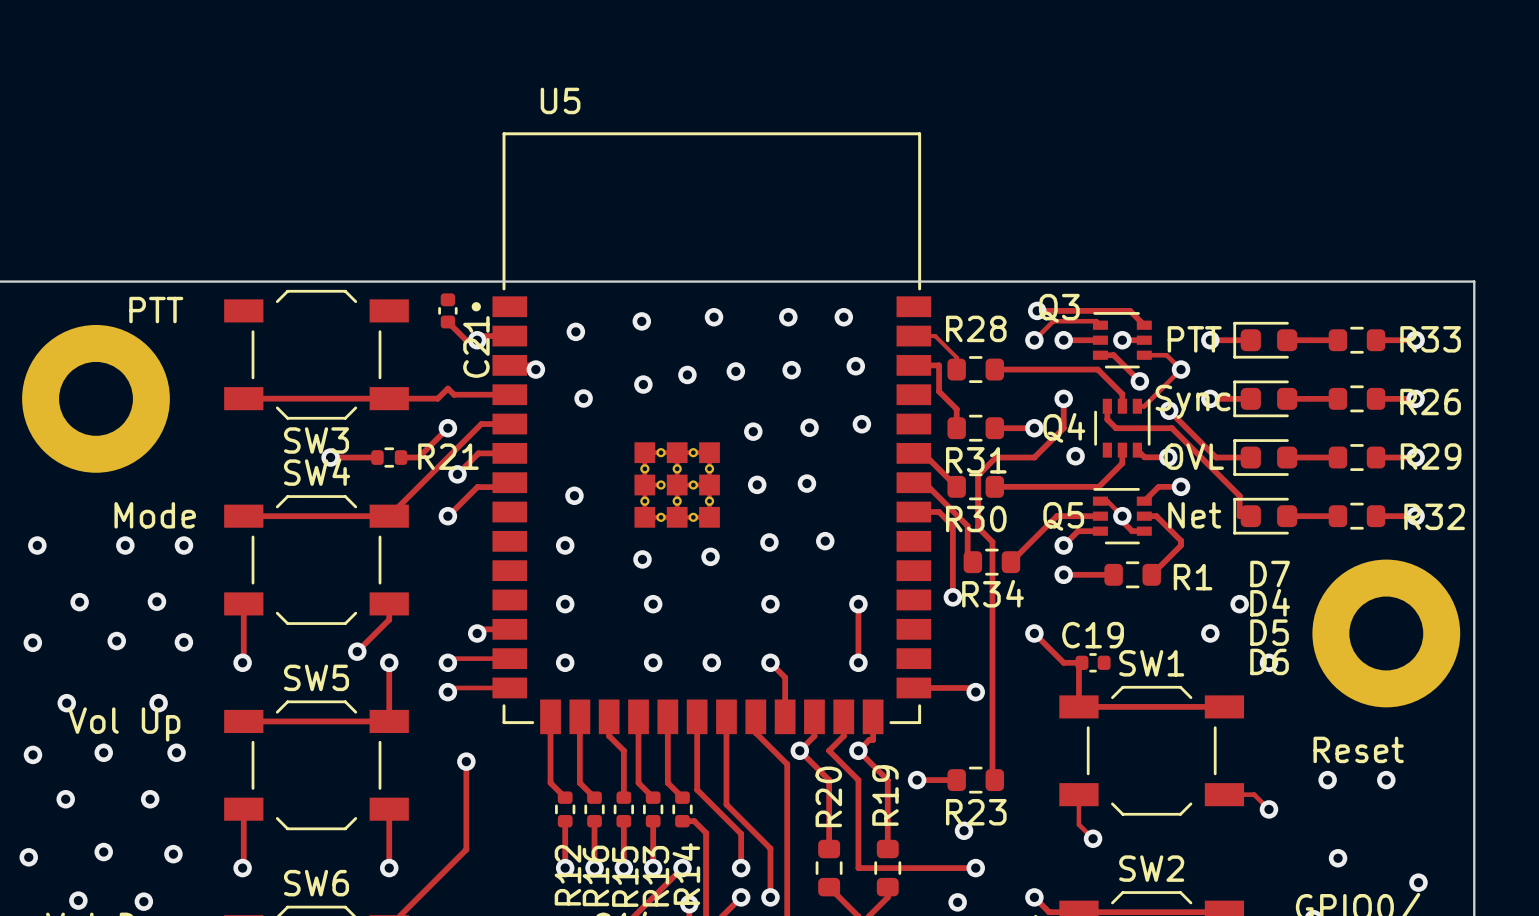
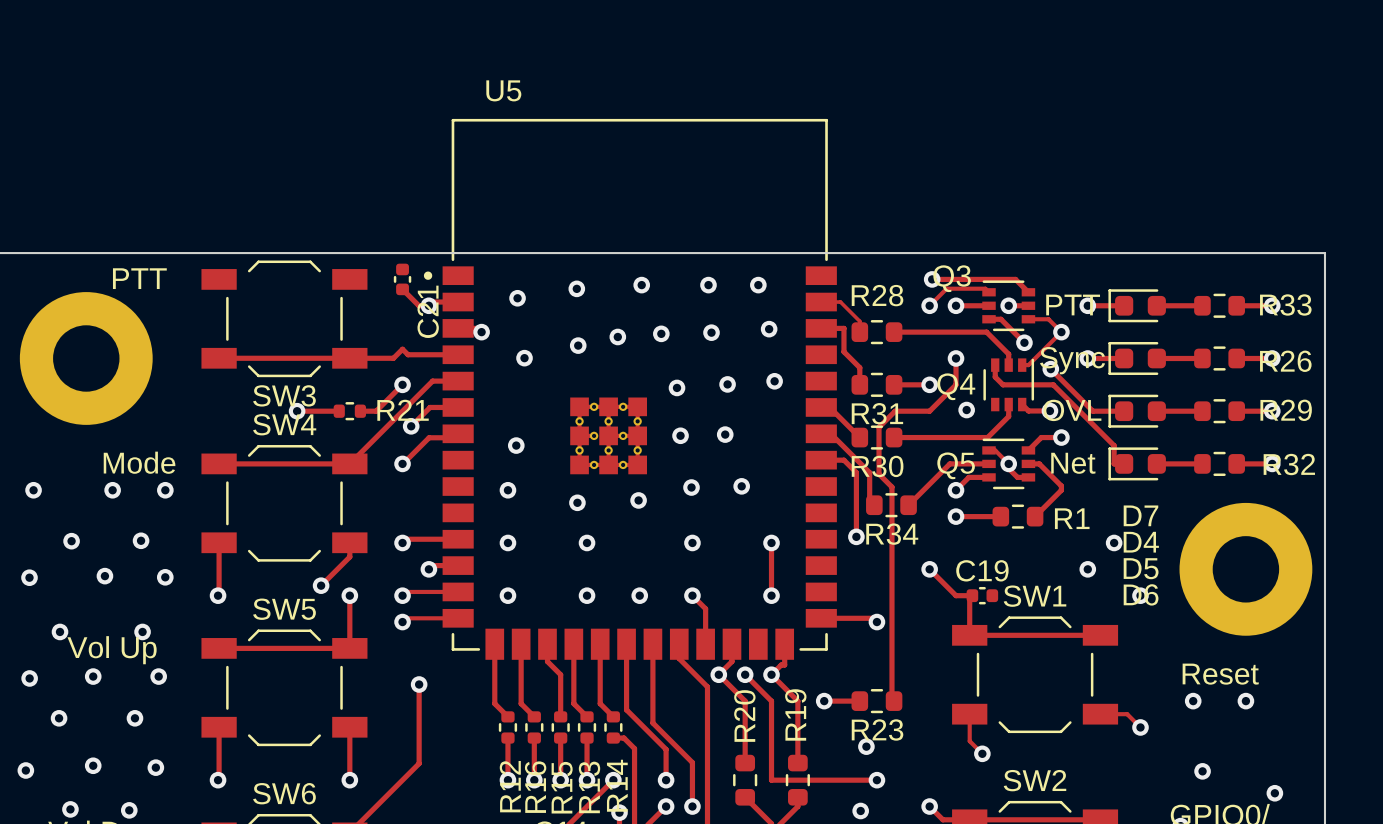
track: none -> (458, 539) (406, 539) (402, 542)
via: none -> (402, 542)
track: (843, 716) (843, 736) (829, 750) -> none
via: none -> (745, 674)

